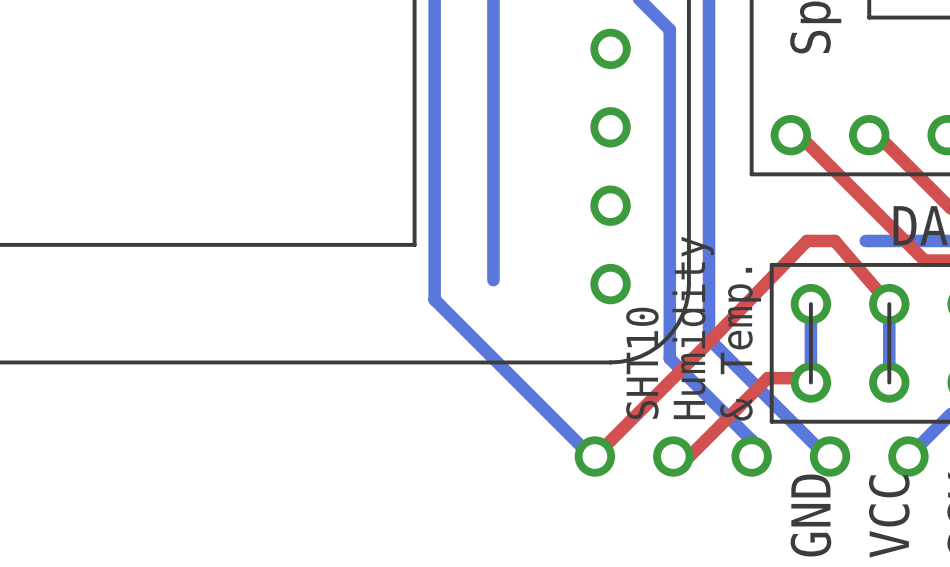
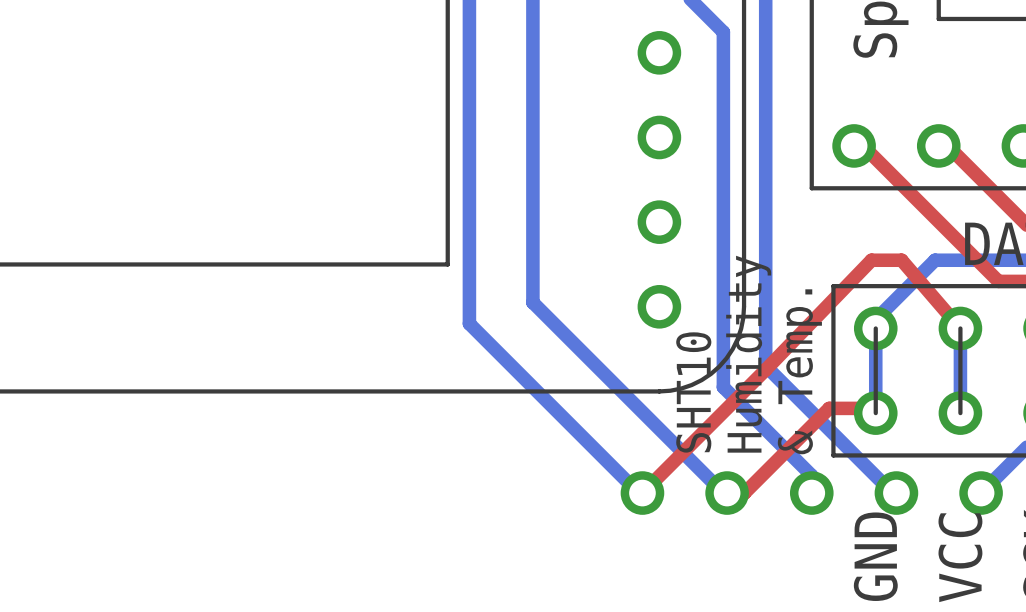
bottom track: none -> (935, 260) (875, 319)
bottom track: none -> (532, 302) (723, 493) (727, 493)

